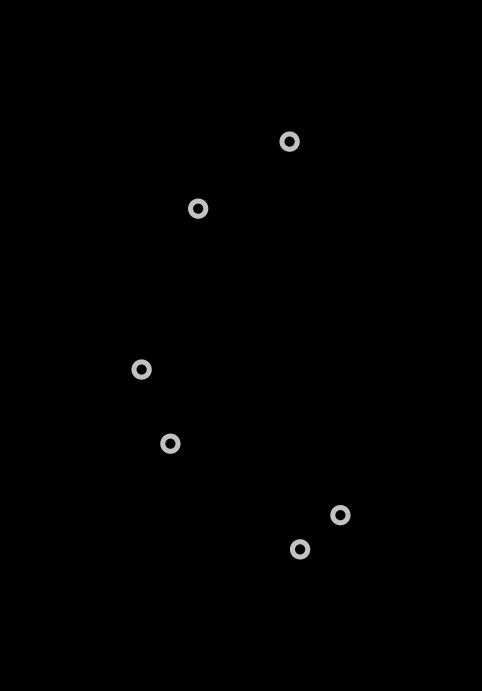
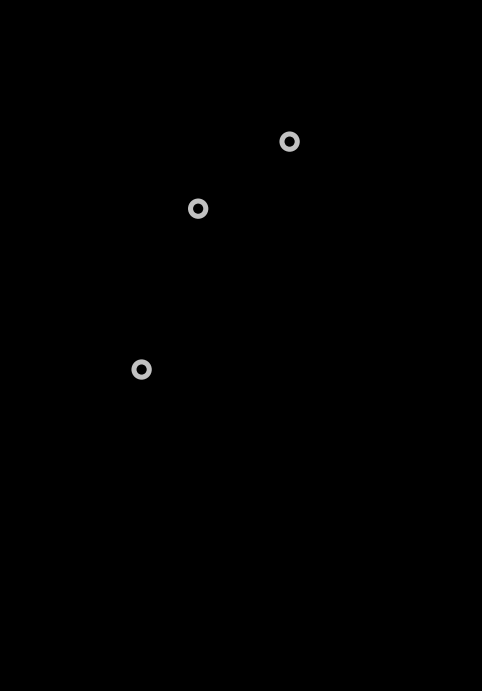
via: (170, 443) -> none
via: (340, 515) -> none
via: (300, 549) -> none

